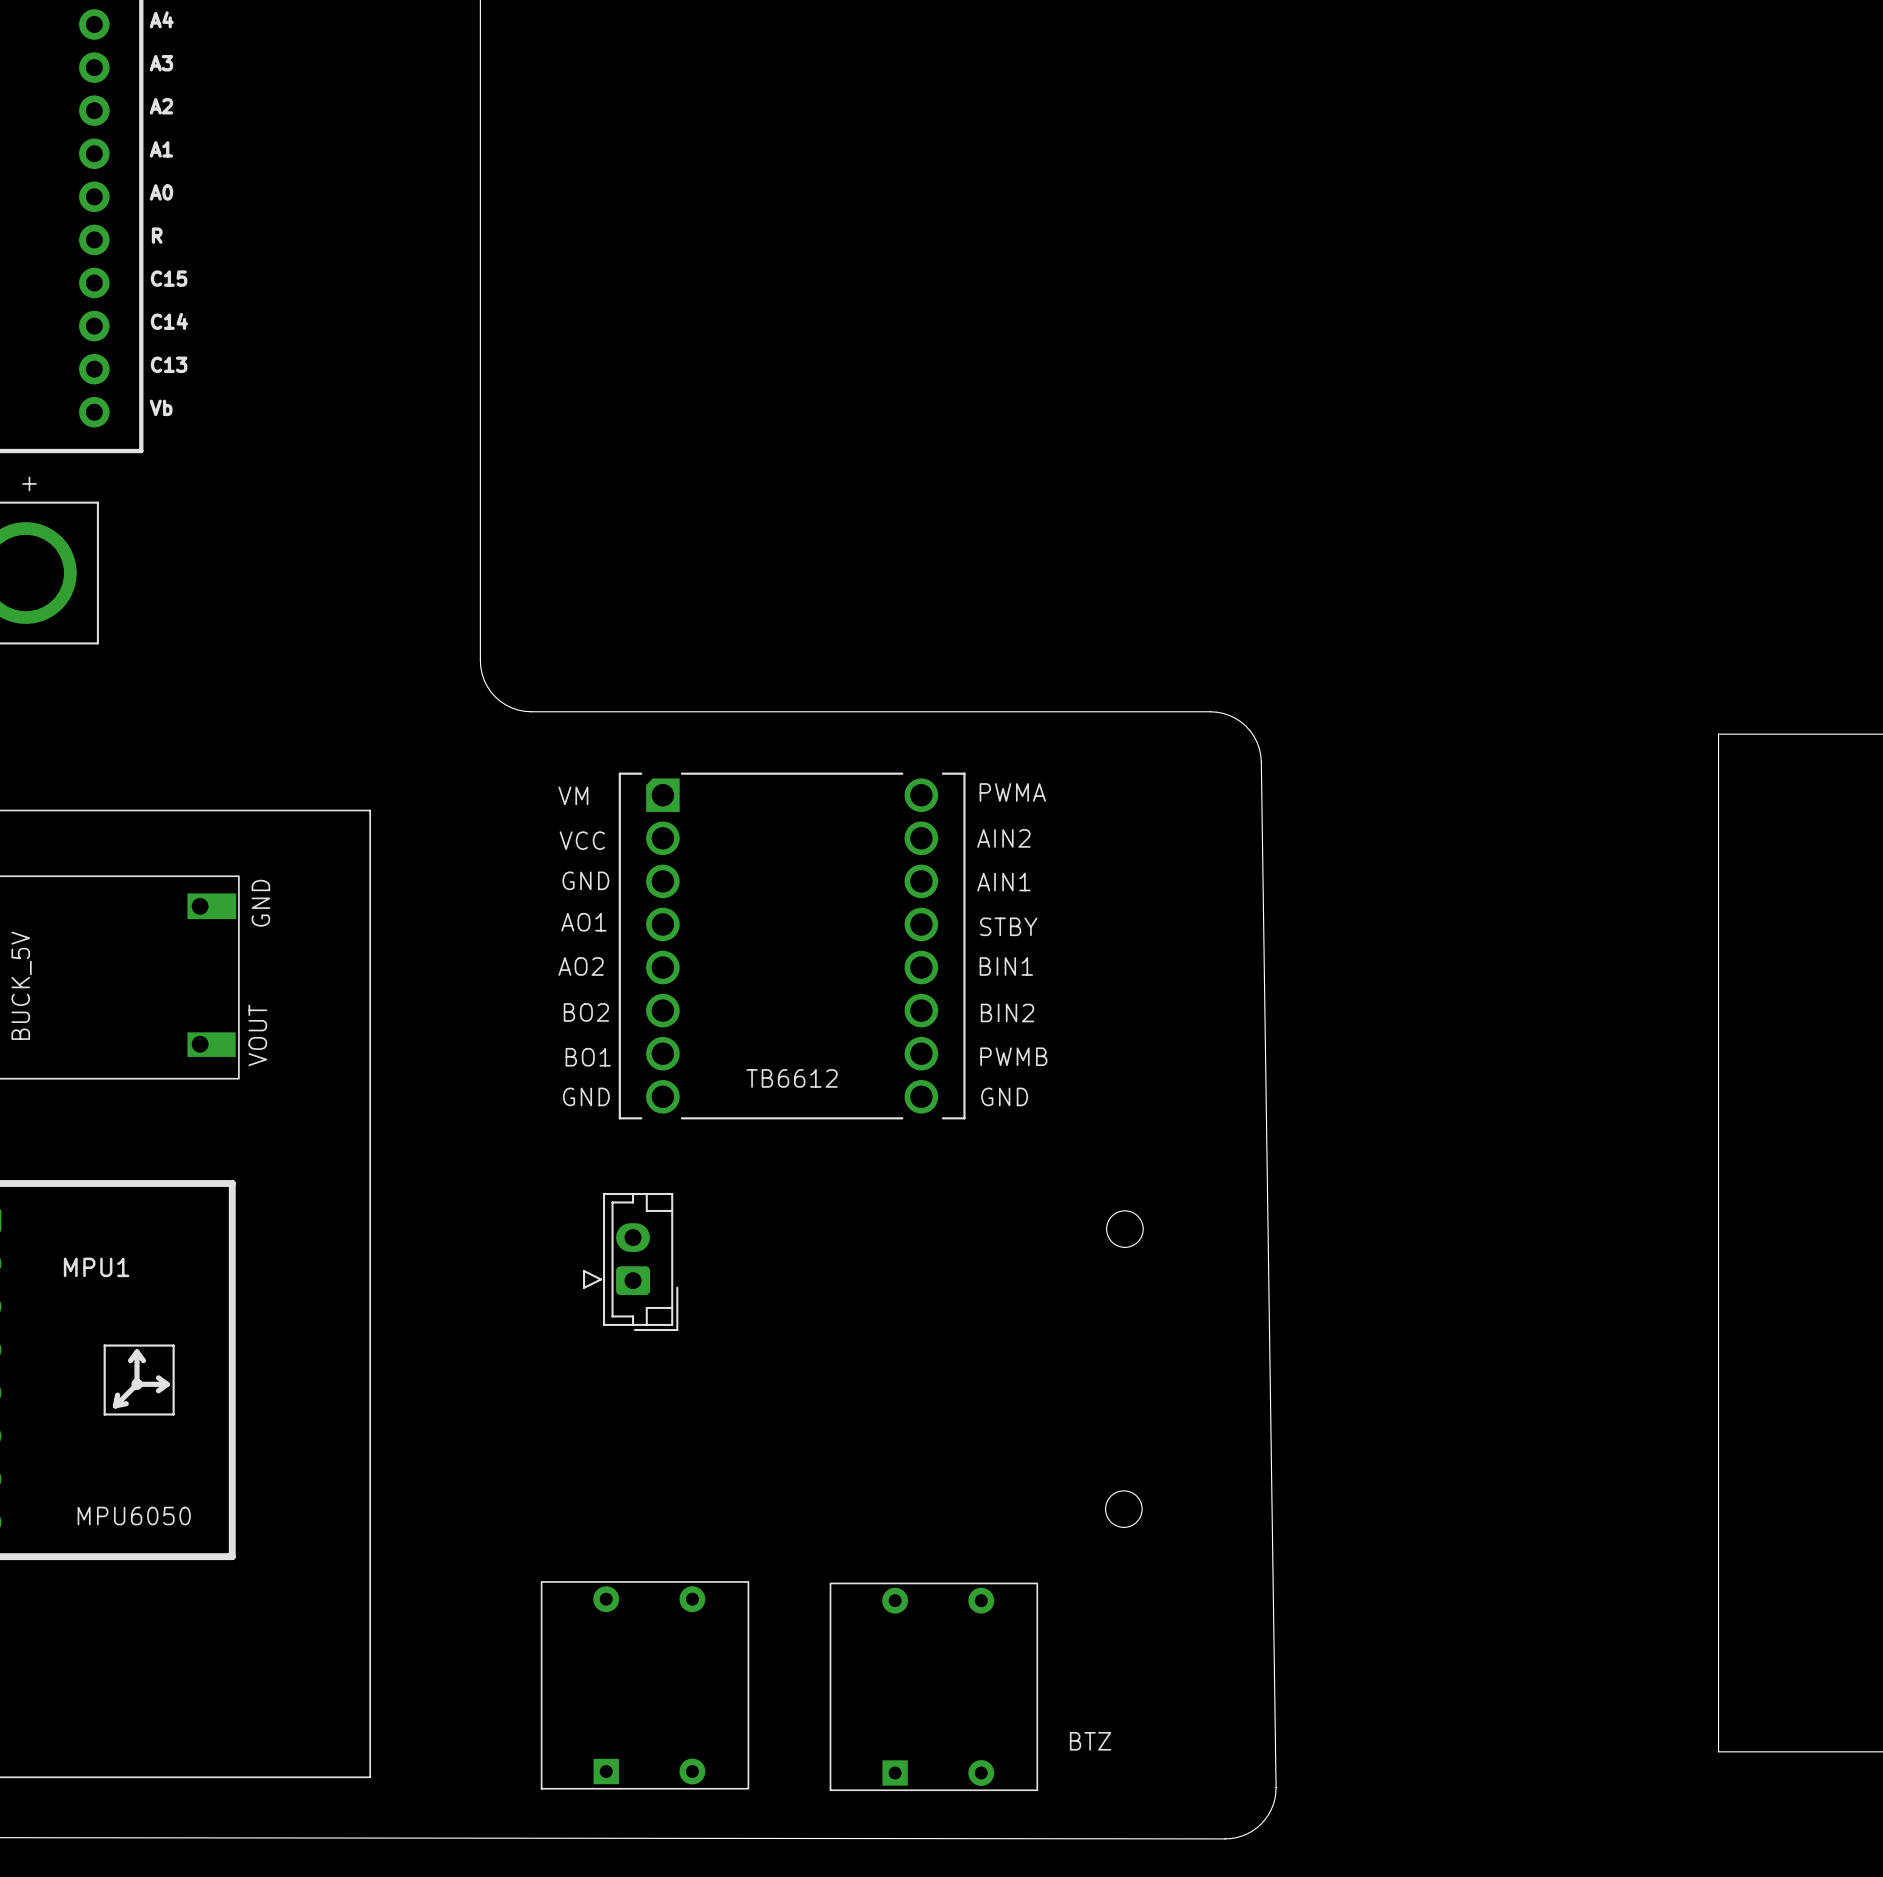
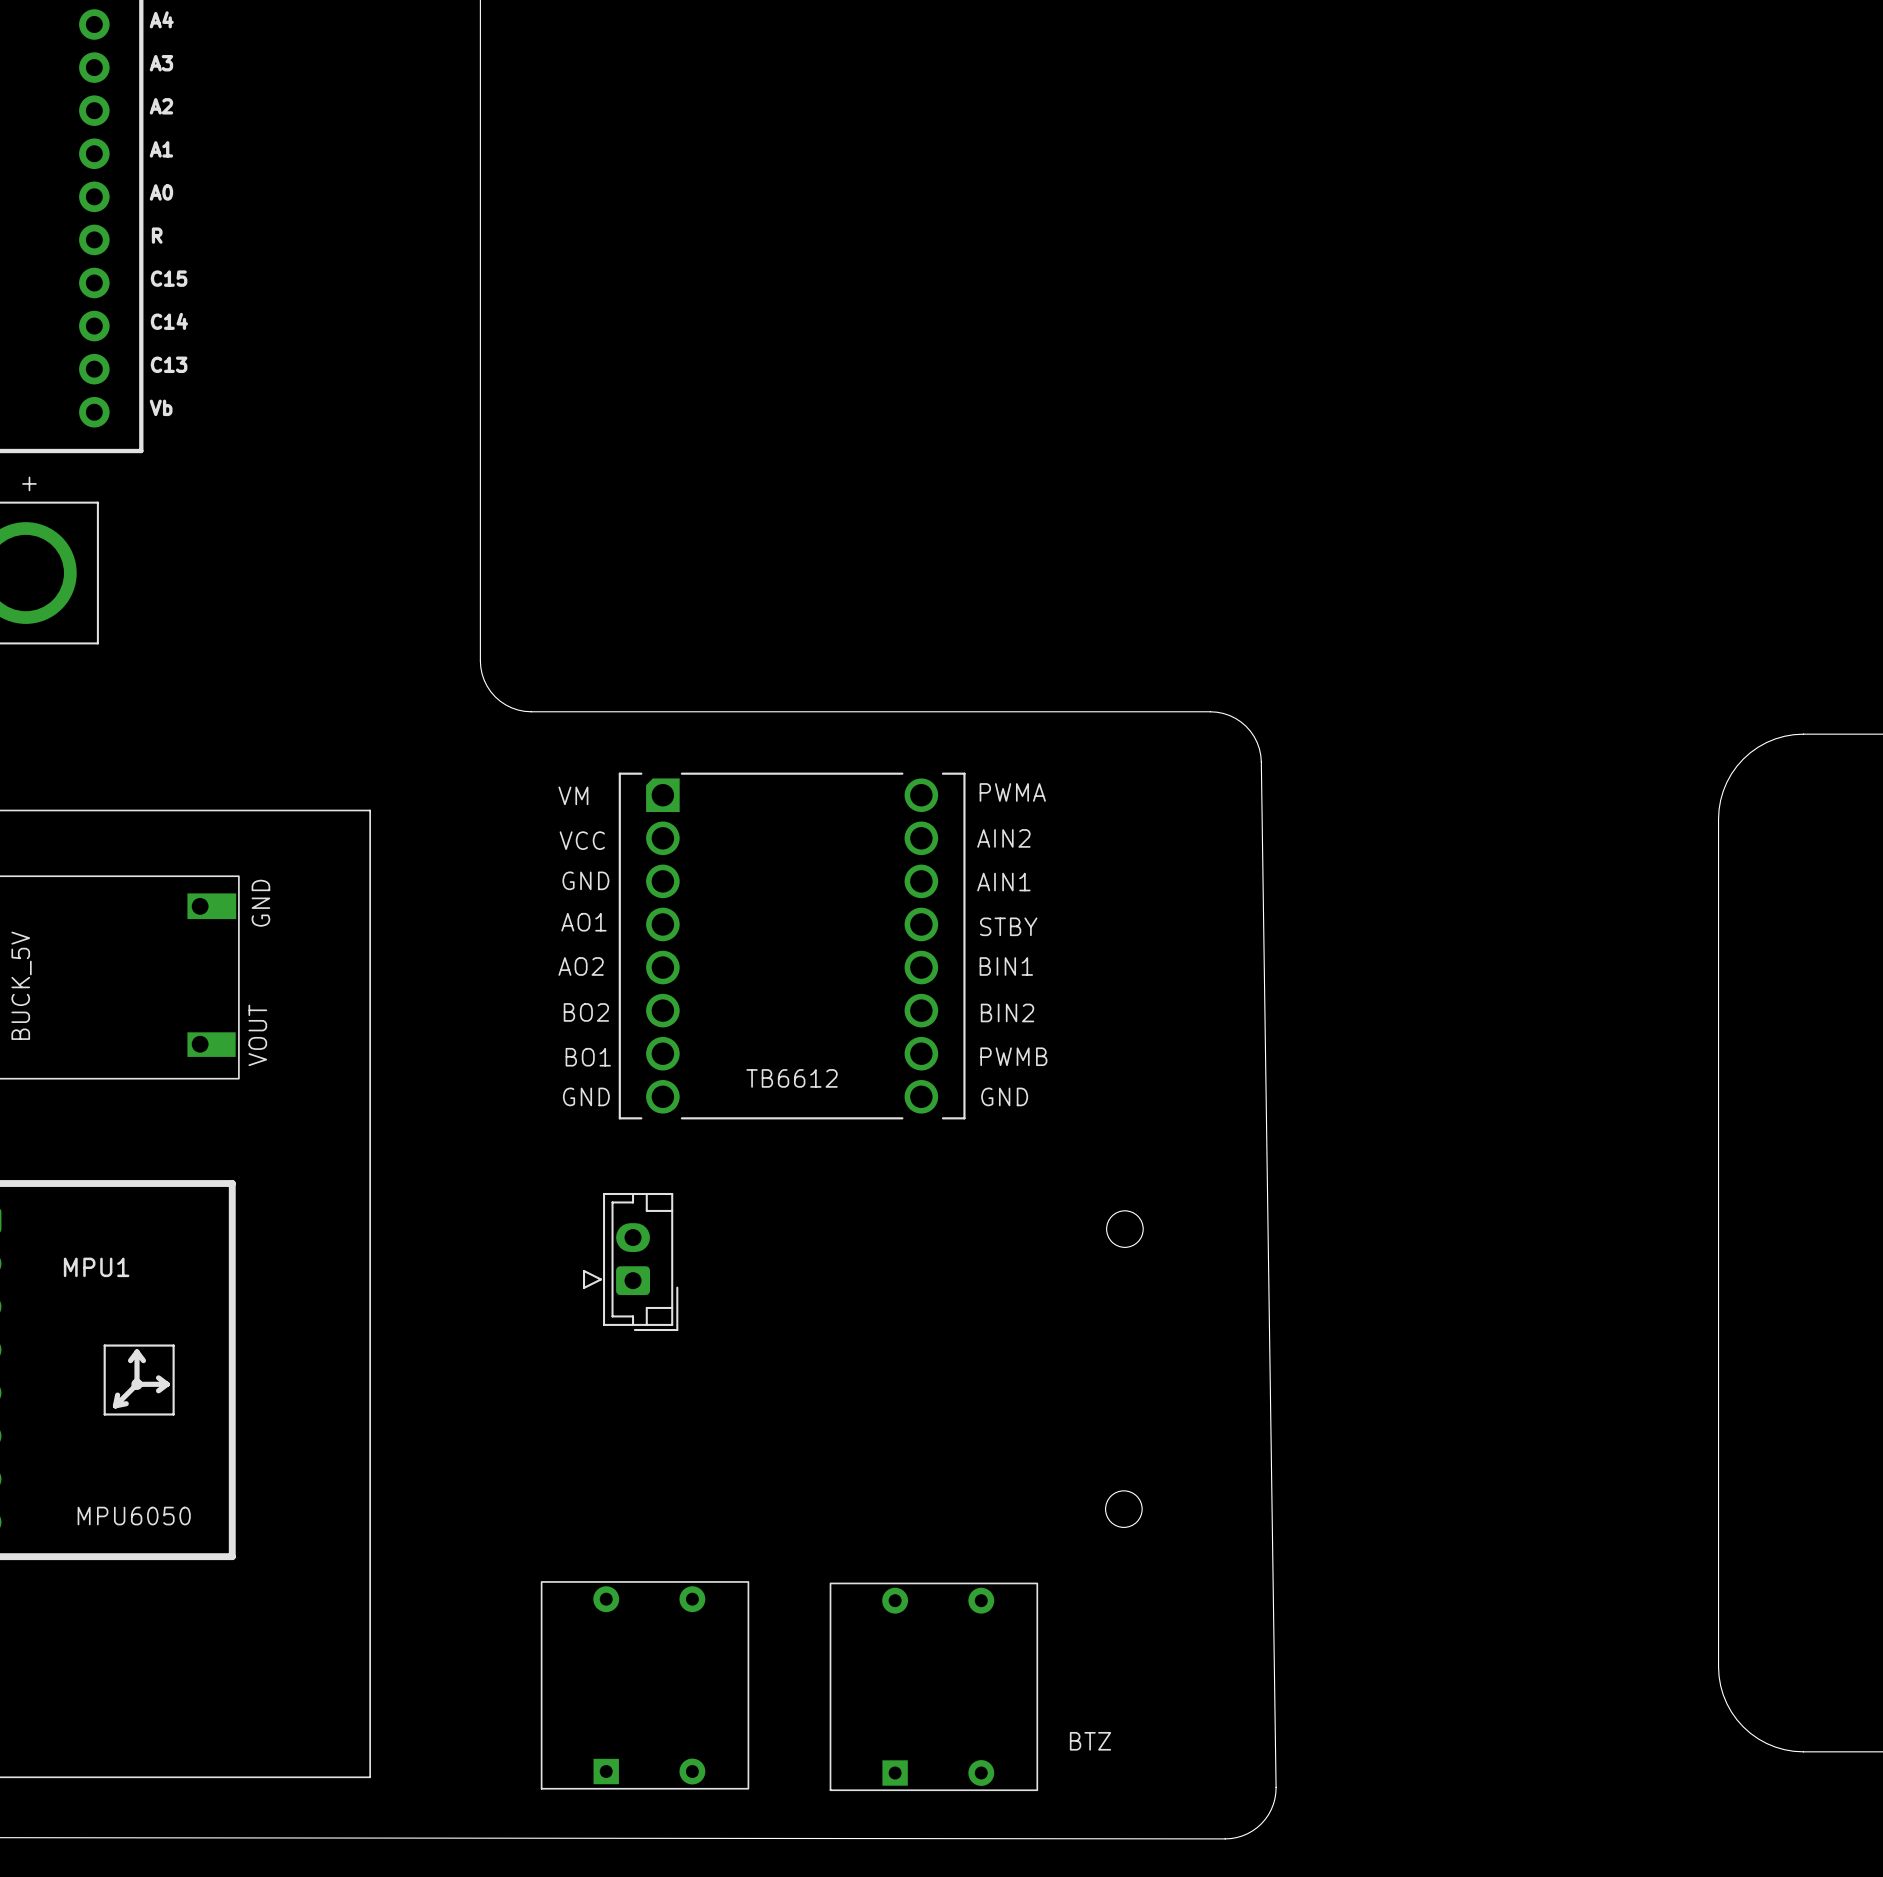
board edge: (1803, 734) (1718, 734) (1718, 818) -> (1803, 734) (1784, 736) (1766, 742) (1743, 759) (1726, 782) (1720, 800) (1718, 818)
board edge: (1718, 1667) (1718, 1751) (1803, 1751) -> (1718, 1667) (1723, 1695) (1731, 1712) (1743, 1727) (1758, 1738) (1775, 1747) (1803, 1751)

